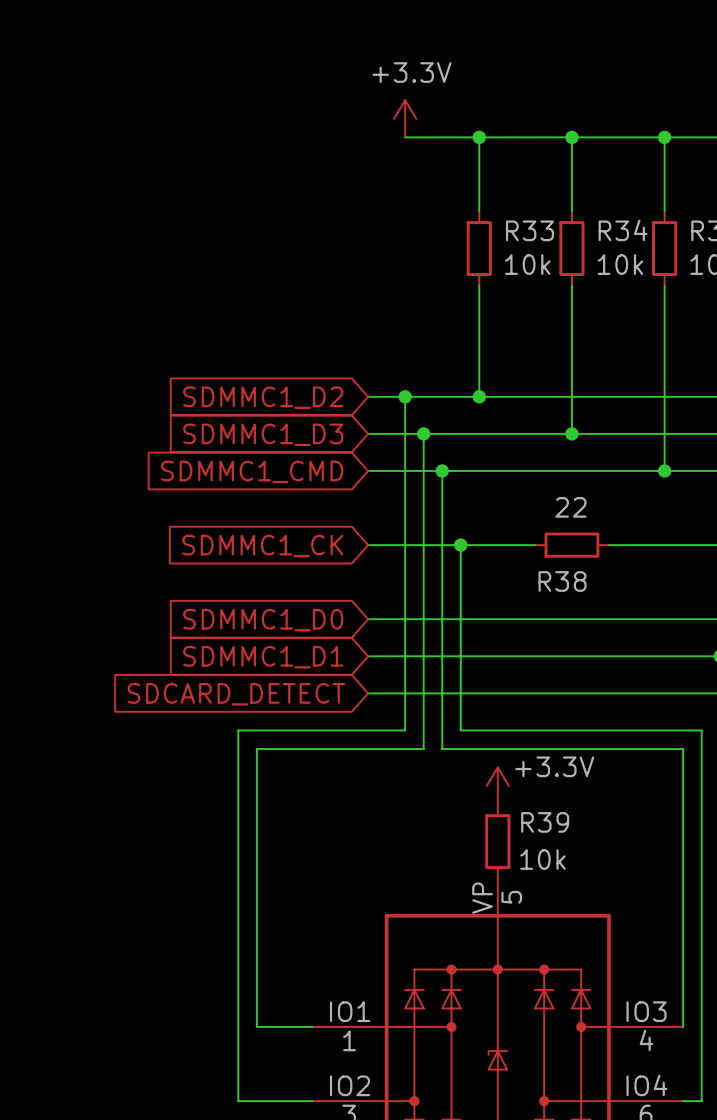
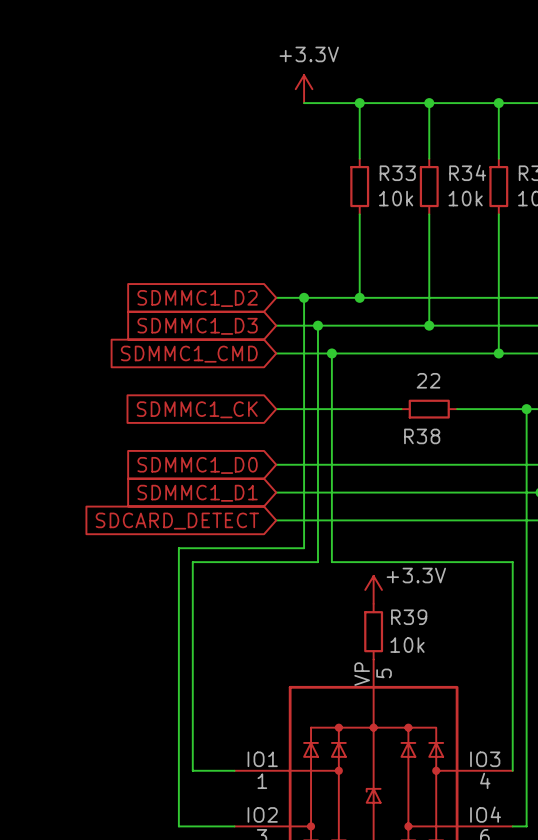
wire: (460, 545) (460, 730) (701, 730) -> (526, 409) (526, 548)
junction: (460, 545) -> none
junction: none -> (526, 409)

